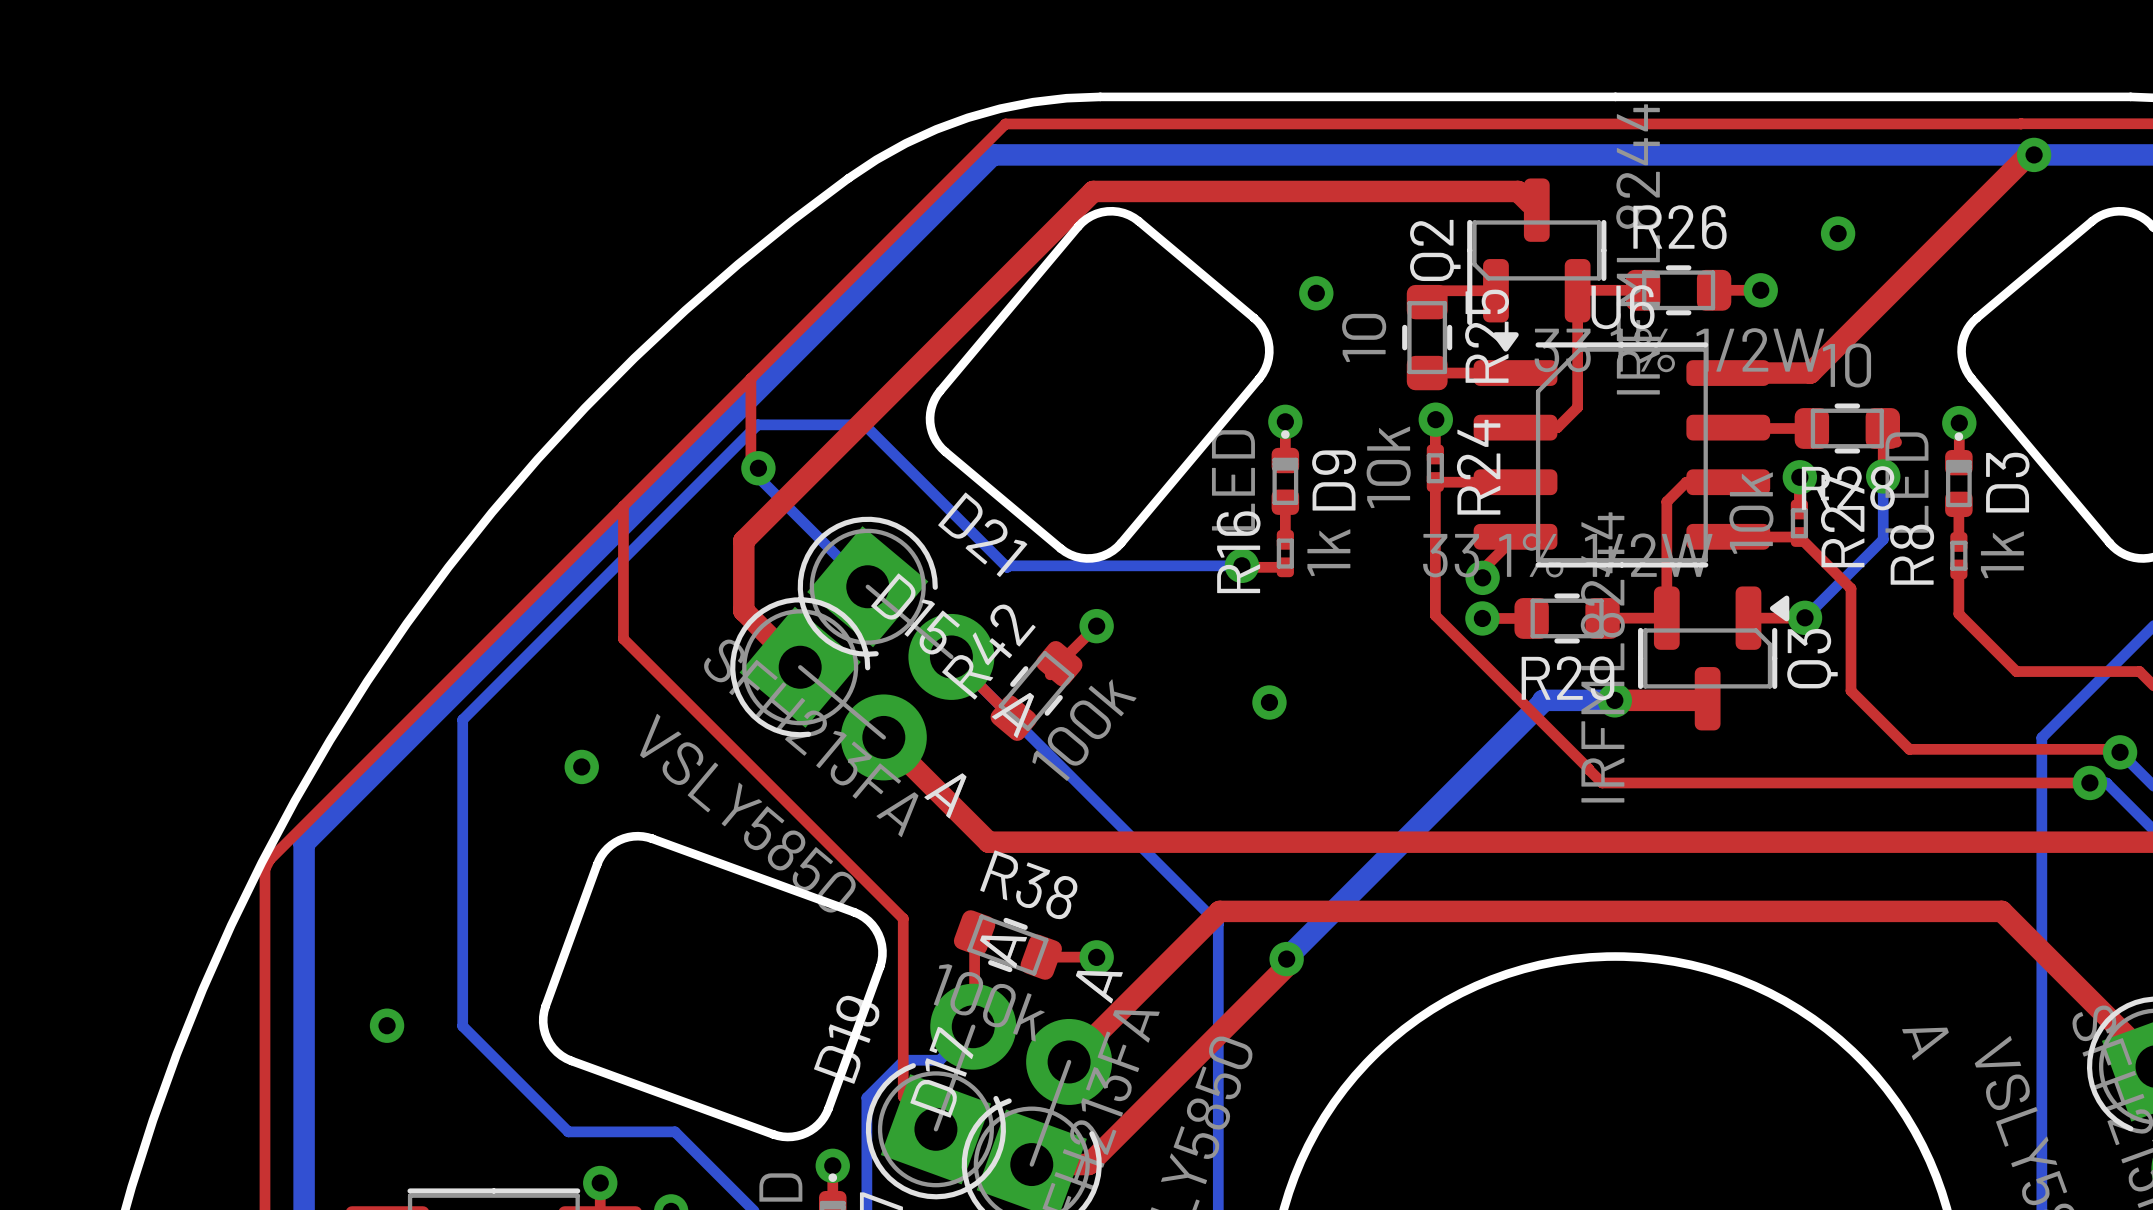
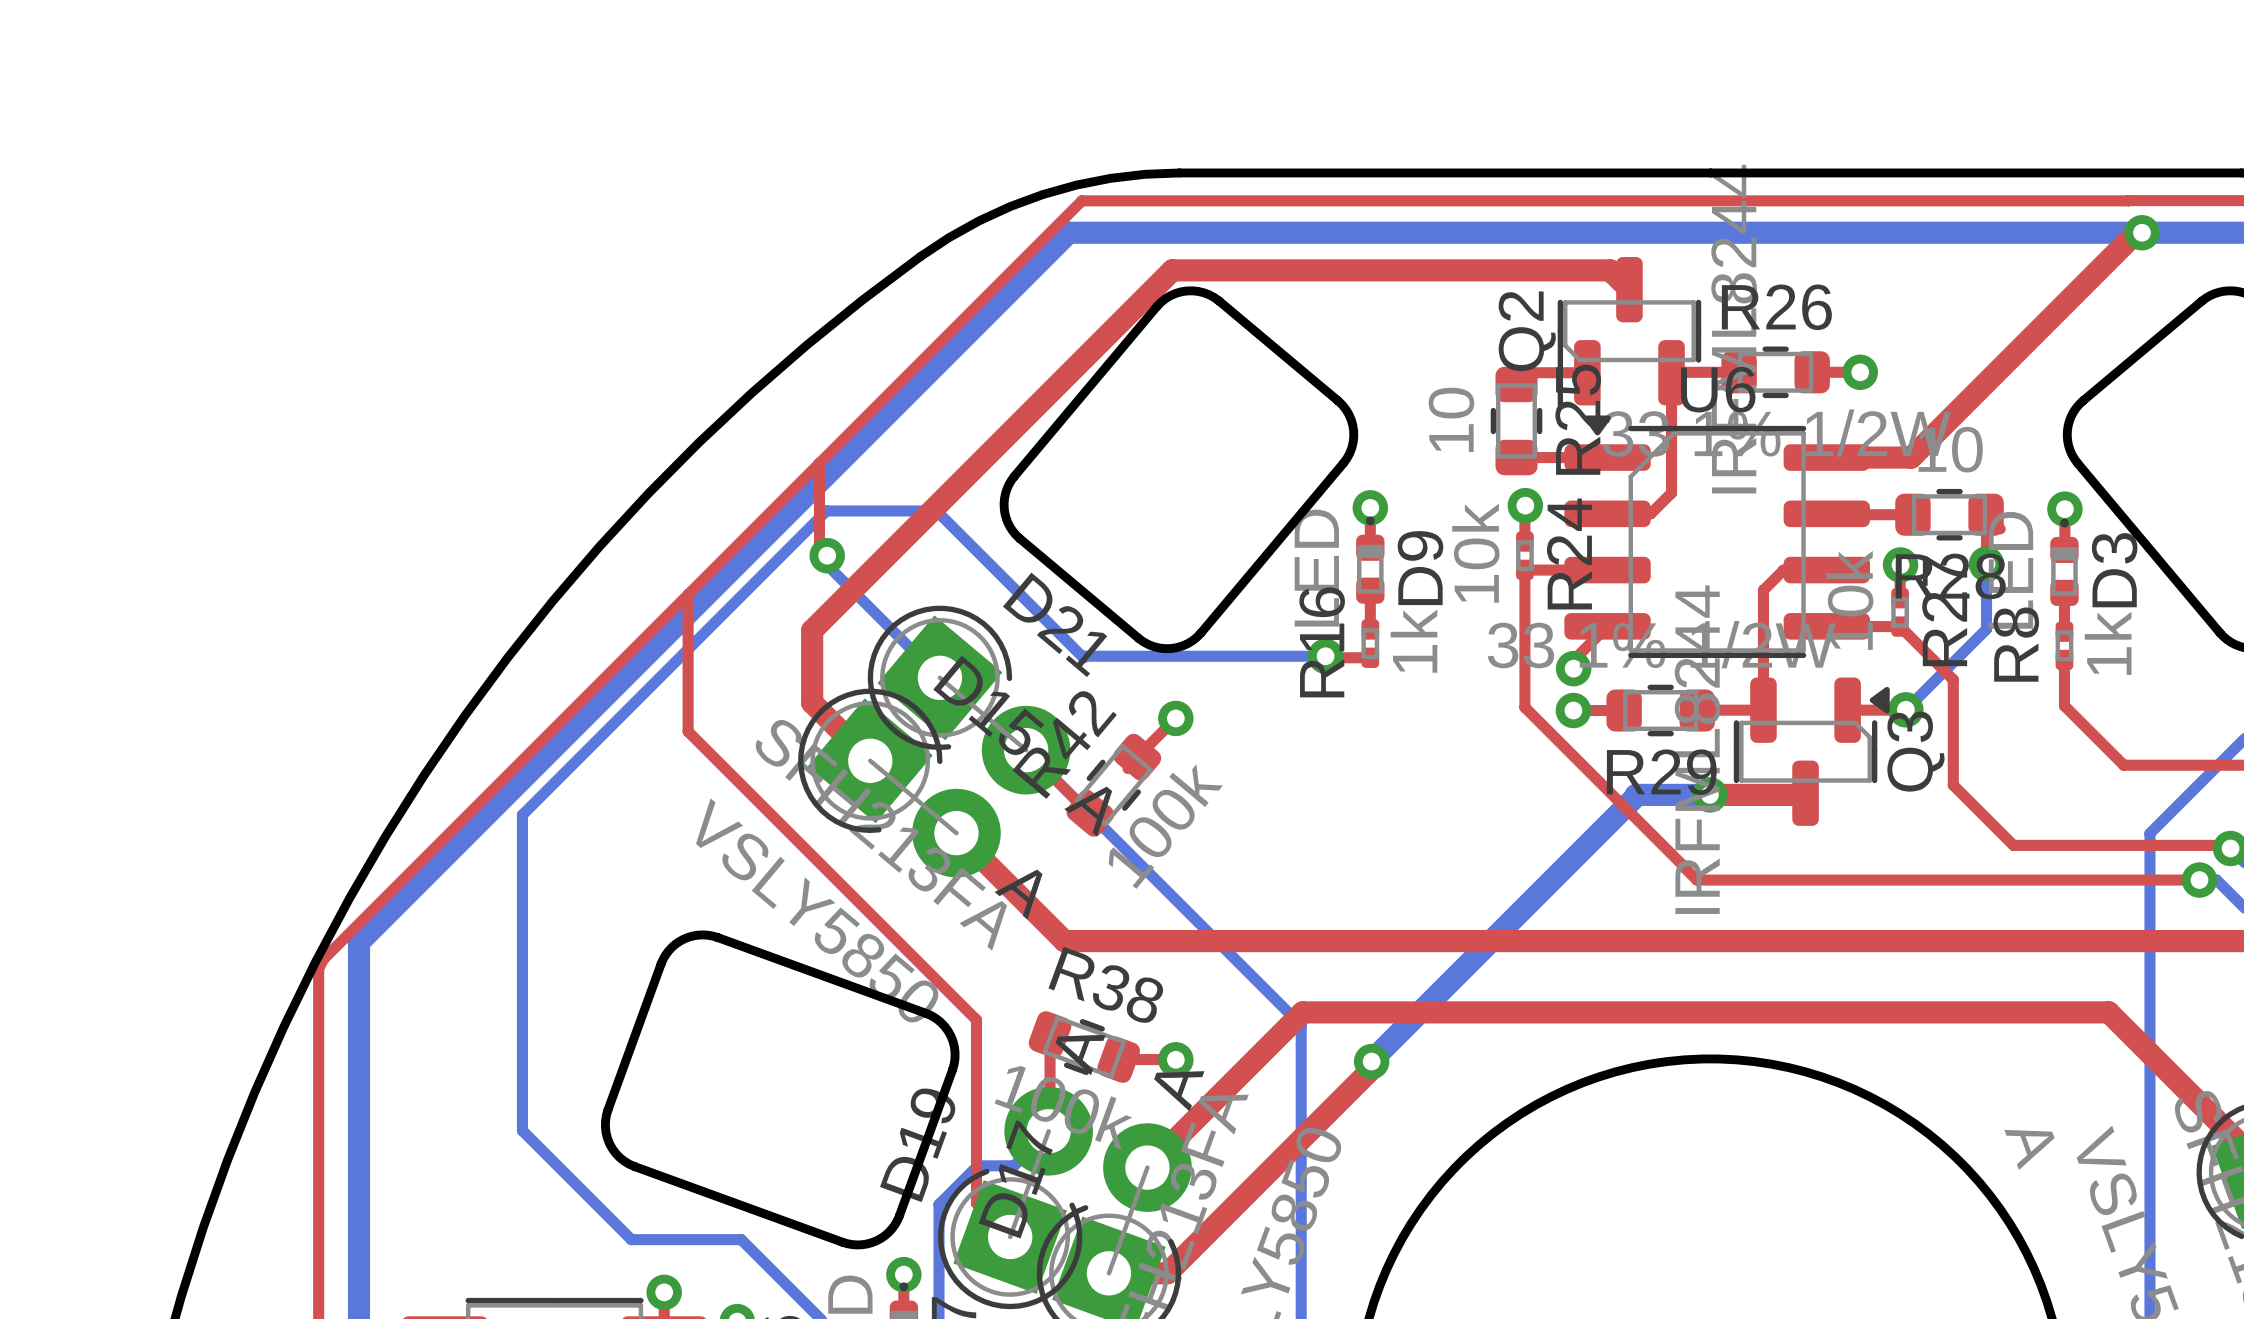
via: (1838, 233) -> none
via: (1316, 293) -> none
via: (1269, 702) -> none
via: (581, 766) -> none
via: (387, 1025) -> none

